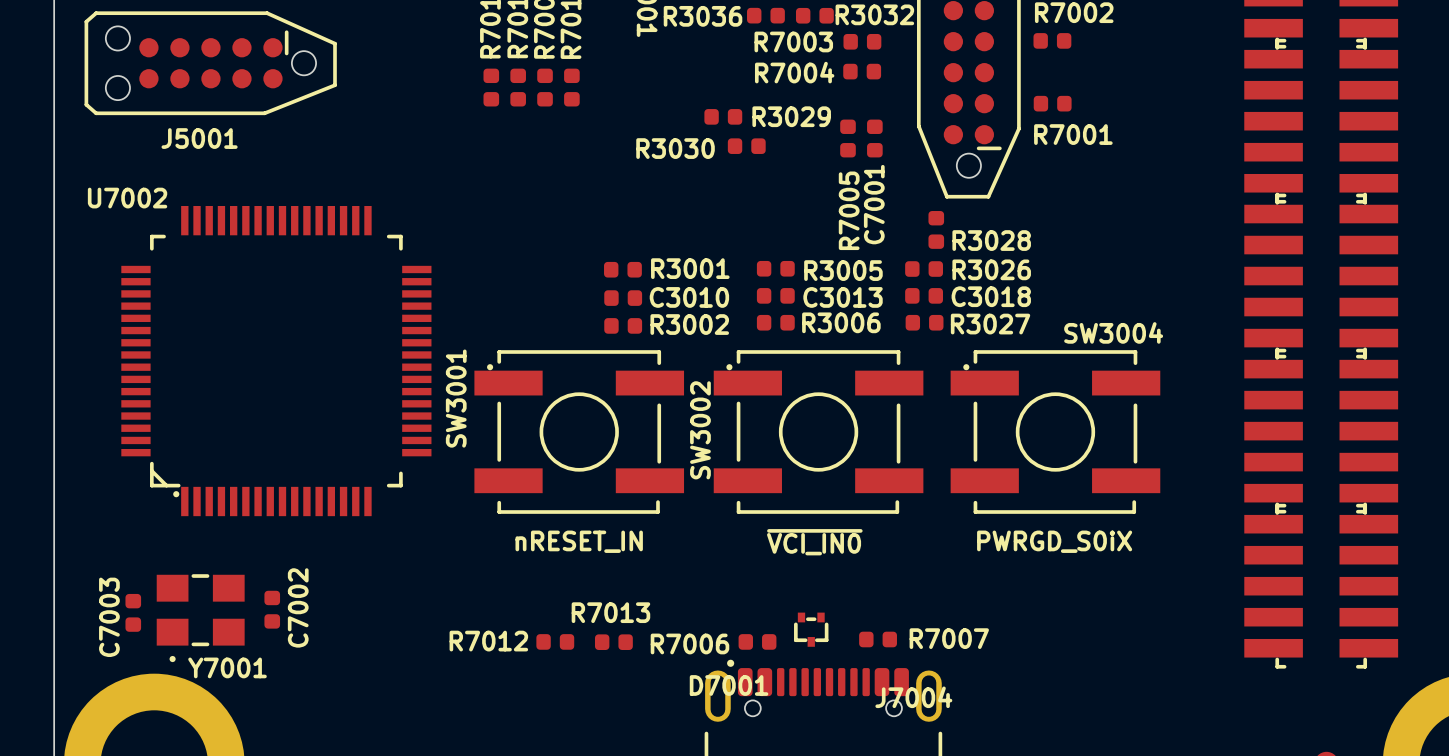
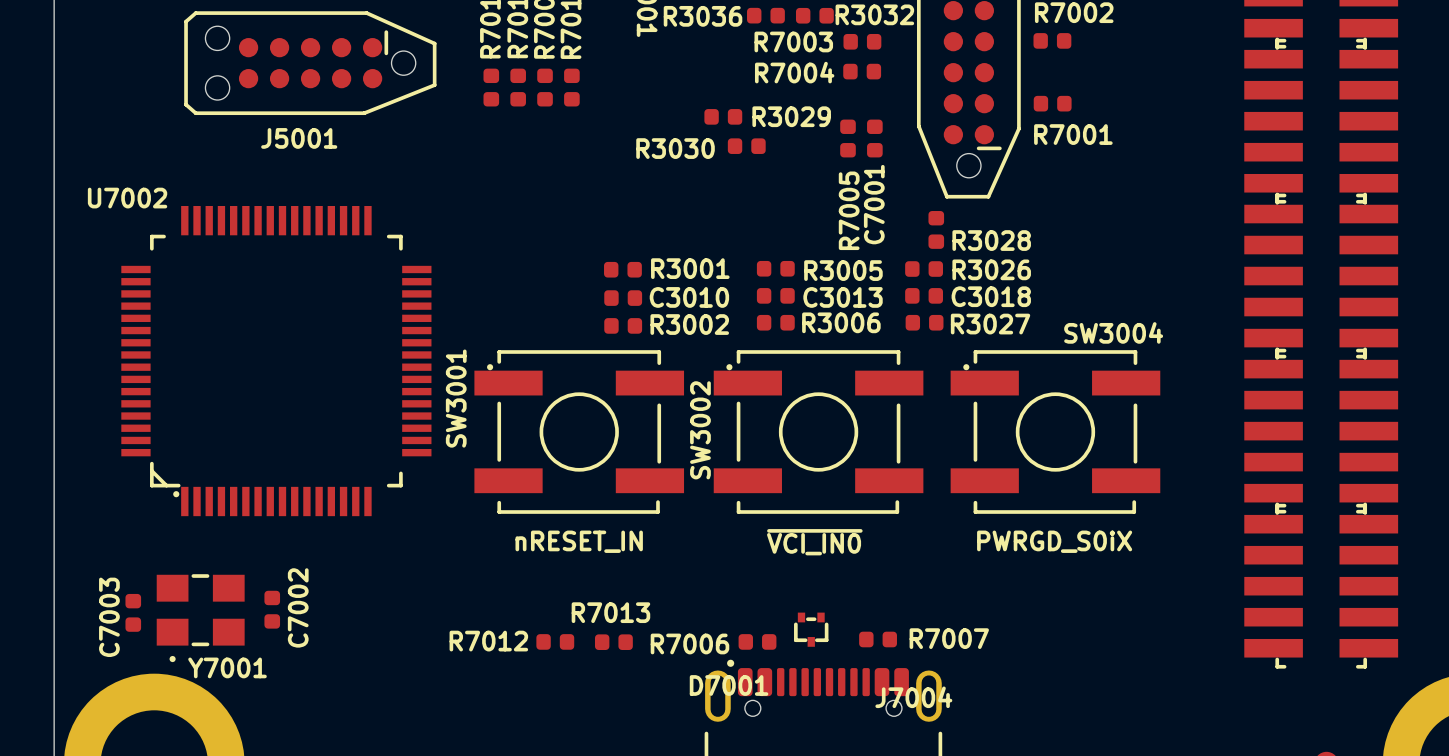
J5001 position: (210, 63) -> (310, 63)

